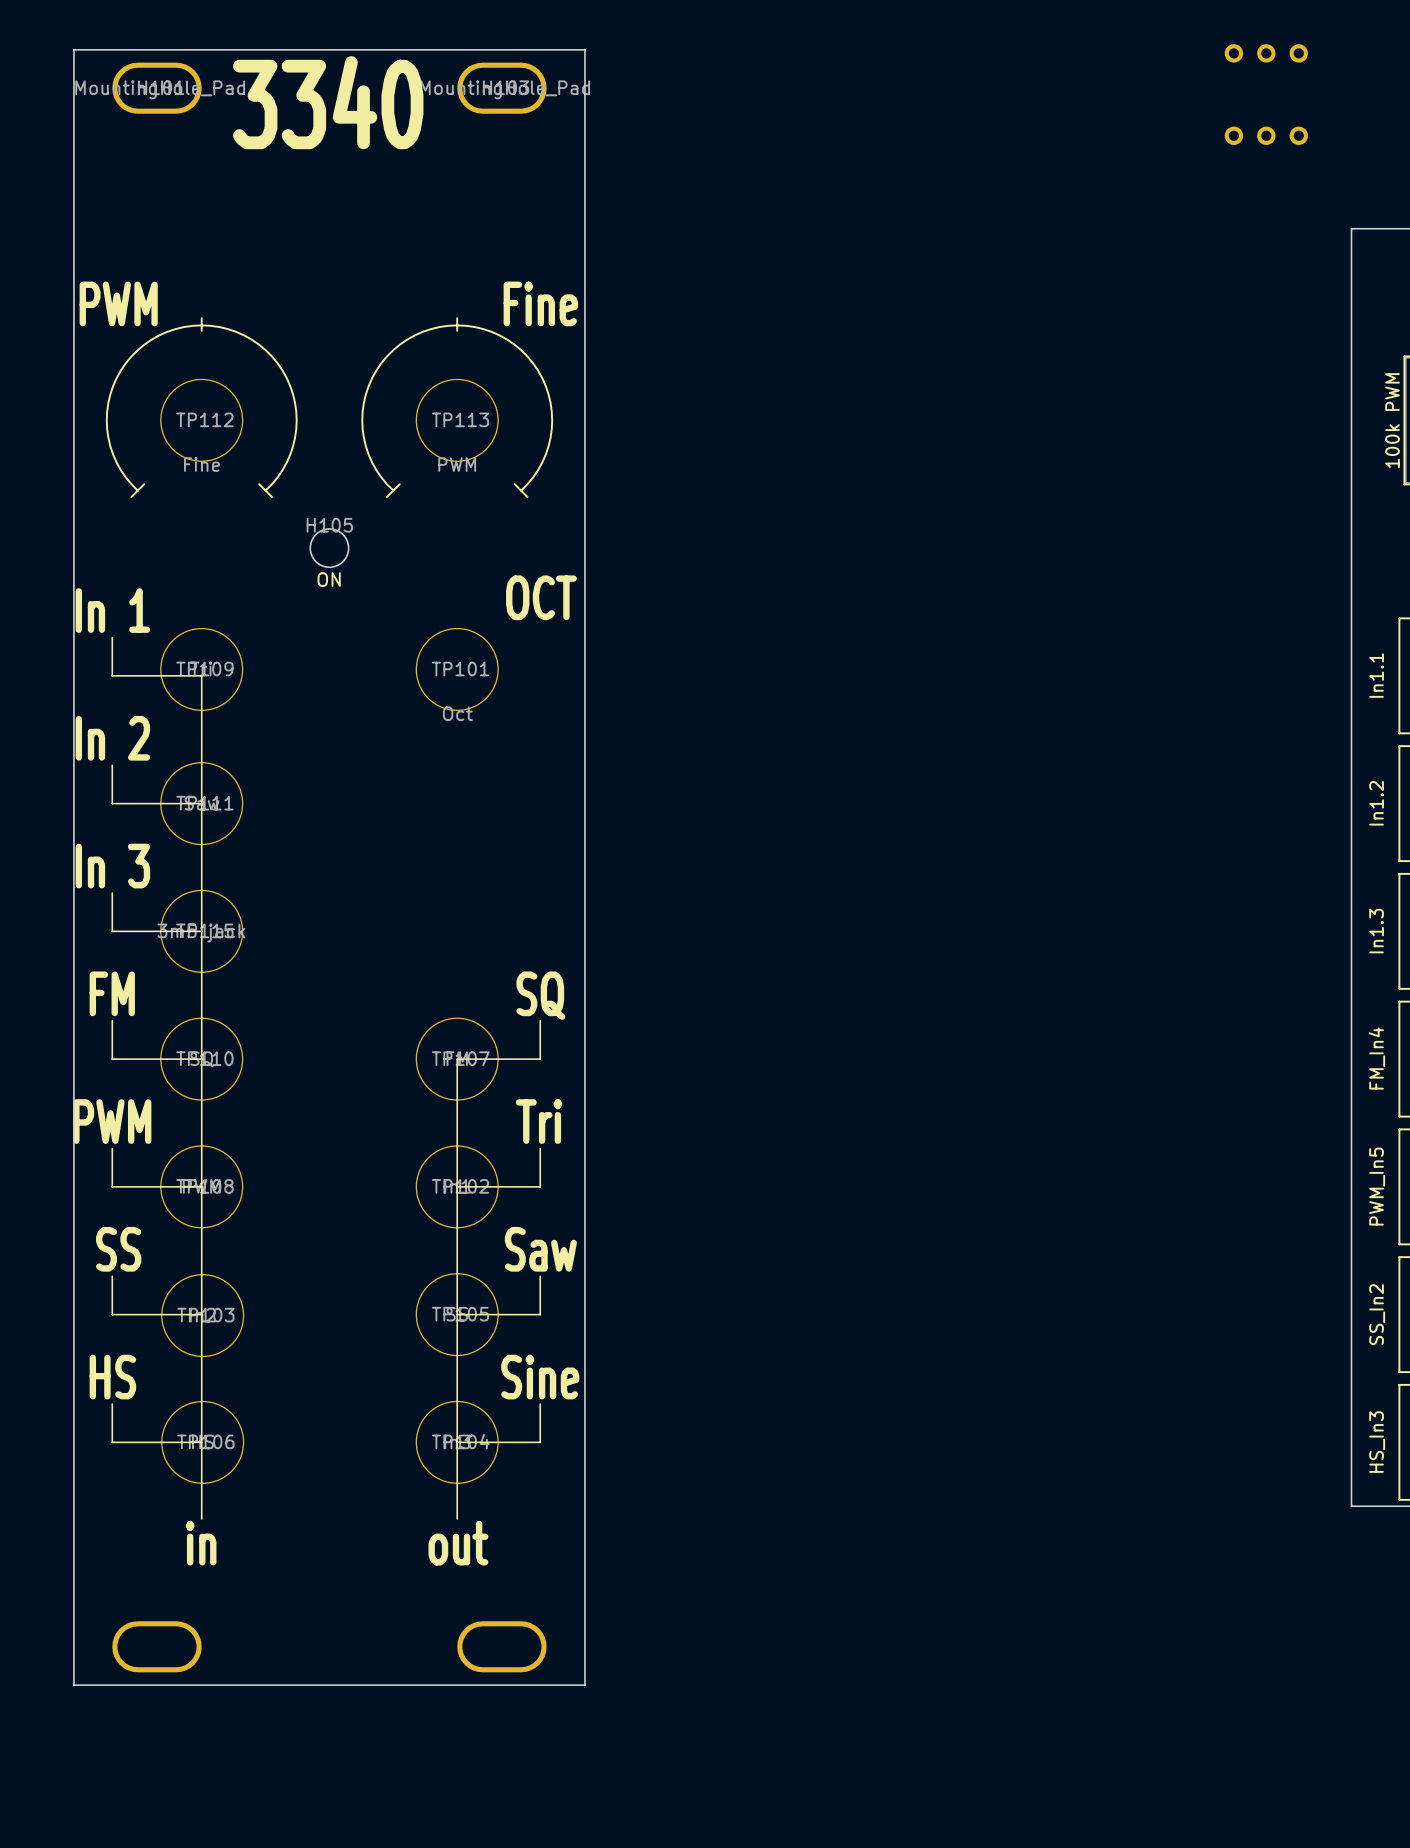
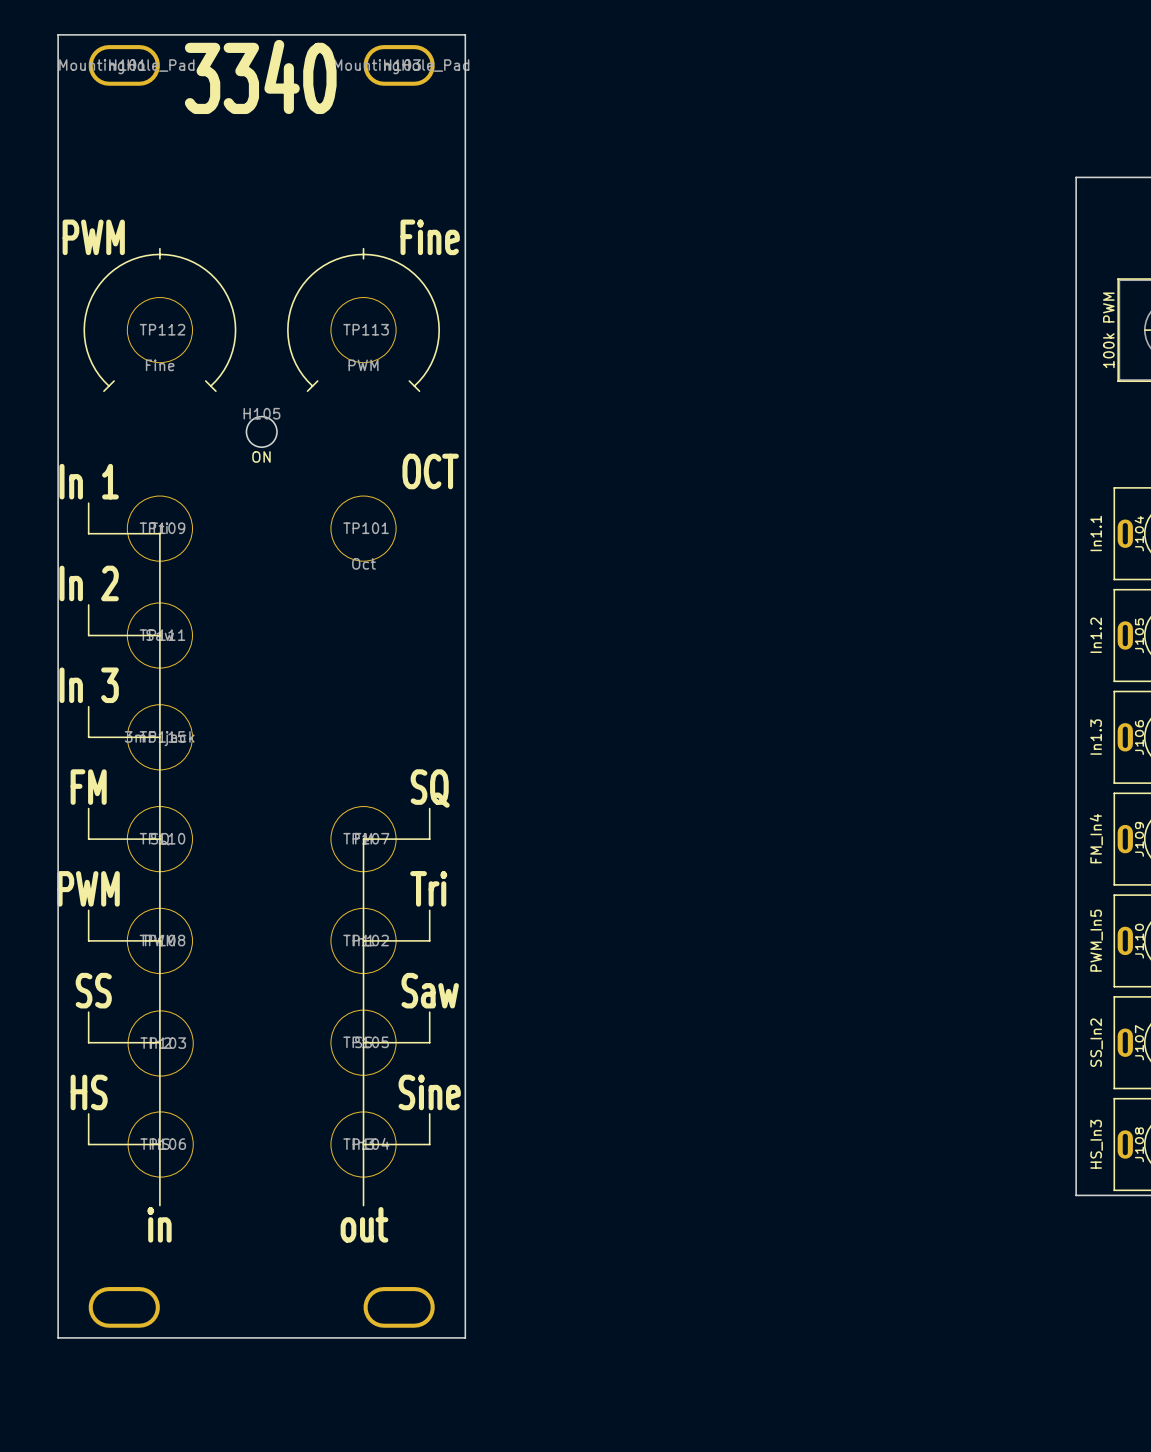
part: (1266, 53) -> none
part: (1266, 135) -> none

